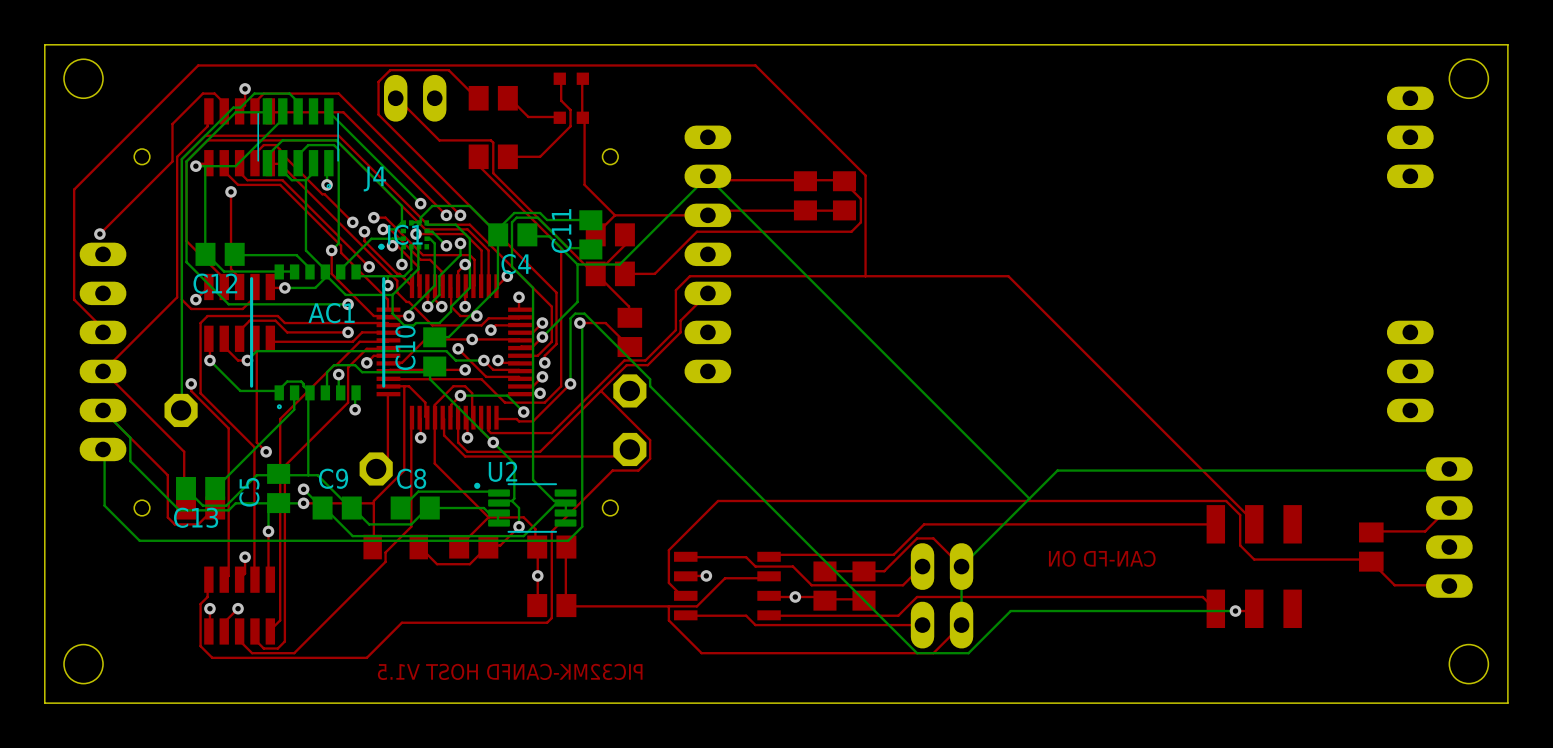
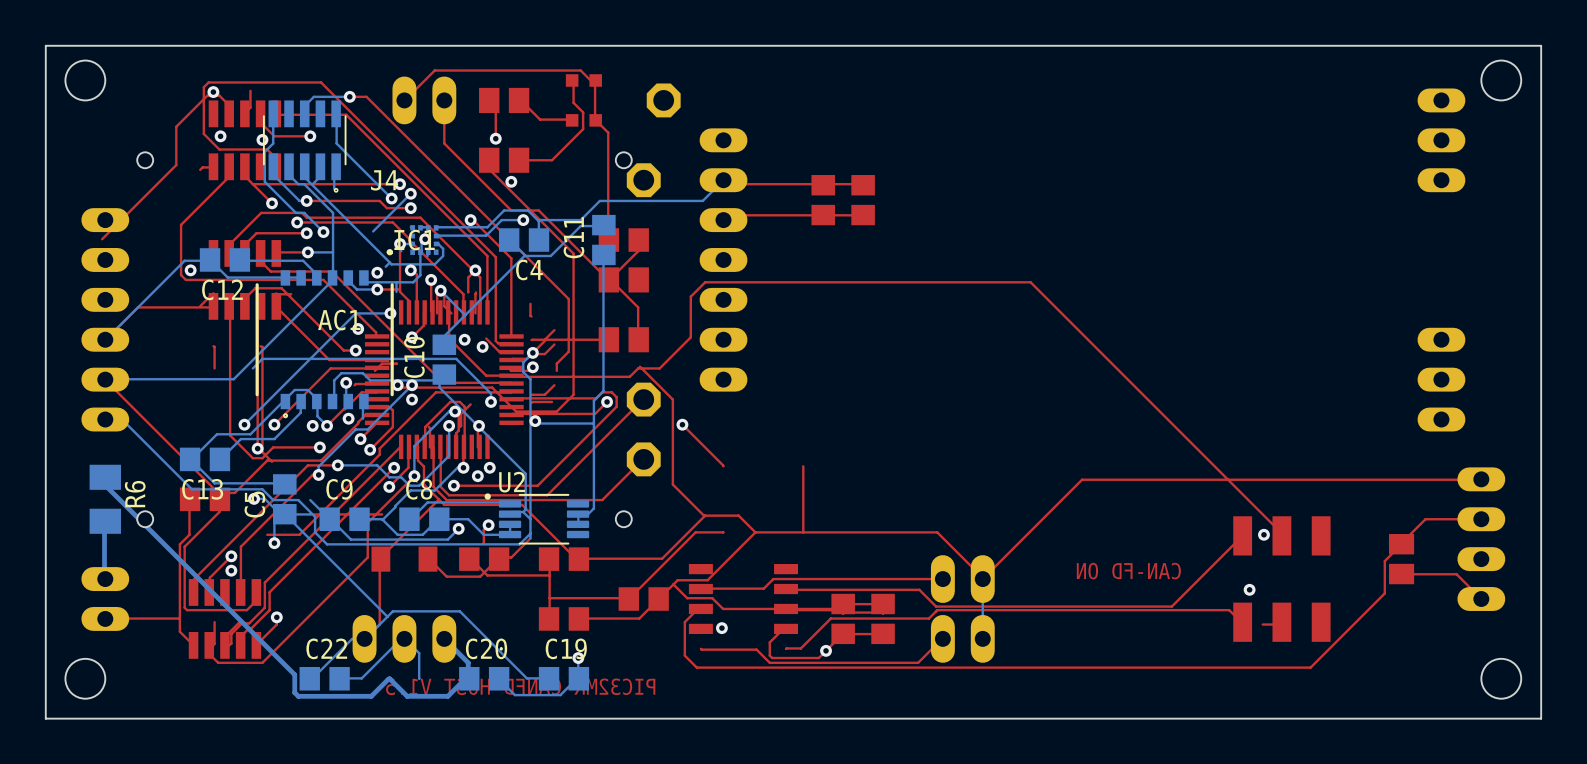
top track: none -> (595, 80) (591, 81) (580, 70) (434, 70) (404, 100)
via: (245, 88) -> none
via: none -> (213, 92)
top track: none -> (349, 96) (366, 96) (386, 117)
via: none -> (349, 96)
top track: (396, 98) (439, 140) (490, 140) (493, 142) (493, 173) (595, 273) -> (444, 100) (444, 143) (511, 210) (538, 210) (608, 279)
top track: (478, 98) (448, 70) (390, 70) (378, 81) (378, 114) -> (489, 100) (495, 106) (495, 138)
part: none -> (663, 100)
top track: (208, 111) (207, 126) (177, 156) (177, 220) -> (229, 166) (228, 177) (181, 224)
top track: (254, 111) (256, 109) (256, 100) (263, 93) (338, 93) (460, 215) -> (260, 113) (261, 123) (274, 136) (310, 136)
bottom track: (267, 111) (235, 112) (186, 161) (186, 262) (228, 304) (348, 304) -> (273, 113) (273, 143) (264, 151) (264, 181) (295, 212) (304, 212) (323, 232)
bottom track: (282, 111) (282, 119) (235, 166) (195, 166) -> none
bottom track: (298, 111) (296, 100) (289, 93) (254, 93) (240, 107) (233, 107) (181, 159) (181, 410) -> (304, 113) (305, 105) (313, 96) (349, 96)
bottom track: (329, 112) (420, 203) -> none
top track: (338, 112) (343, 112) (446, 215) -> (346, 114) (487, 255) (487, 312)
top track: (582, 117) (584, 119) (584, 184) (615, 215) -> (595, 120) (608, 132) (608, 240)
via: none -> (220, 136)
via: none -> (310, 136)
via: none -> (495, 138)
via: none -> (262, 139)
bottom track: (334, 145) (308, 145) (298, 154) (298, 163) -> (341, 148) (336, 143) (336, 114)
bottom track: (338, 149) (338, 243) (331, 250) -> (346, 153) (391, 198)
top track: (224, 163) (226, 163) (226, 173) (238, 184) (280, 184) (341, 245) (341, 252) (387, 299) (388, 309) -> none
top track: (254, 163) (256, 161) (256, 152) (263, 145) (275, 145) (280, 152) (352, 222) -> none
bottom track: (267, 163) (268, 154) (282, 140) (336, 140) (401, 205) (401, 222) (394, 229) (383, 229) -> (273, 166) (274, 175) (299, 200) (306, 200)
top track: (270, 163) (280, 163) (397, 280) (397, 292) (432, 325) (481, 325) (488, 318) (520, 317) -> (276, 166) (275, 157) (267, 149) (219, 149) (203, 133) (203, 87) (208, 82) (321, 82) (495, 257) (495, 340) (498, 343) (511, 344)
via: (195, 166) -> none
bottom track: (205, 166) (205, 254) (224, 271) -> (105, 339) (184, 260) (210, 259) (228, 277)
part: none -> (643, 180)
bottom track: (707, 176) (1029, 498) -> none
via: none -> (511, 181)
top track: none -> (252, 184) (272, 203)
top track: (282, 180) (369, 266) -> (288, 184) (400, 184)
bottom track: (297, 180) (305, 180) (305, 250) (327, 271) (325, 271) -> (304, 184) (333, 212) (331, 281) (233, 379) (105, 379)
via: none -> (400, 184)
top track: (844, 181) (860, 198) (860, 222) (851, 231) (696, 231) (654, 273) (625, 273) -> none
via: (327, 184) -> none
bottom track: none -> (410, 193) (373, 231)
via: none -> (410, 193)
top track: (231, 191) (231, 269) (238, 276) (239, 287) -> none
via: (231, 191) -> none
via: none -> (391, 198)
top track: none -> (306, 200) (379, 200) (386, 208) (410, 208)
via: none -> (306, 200)
bottom track: (687, 196) (619, 264) (577, 264) -> (702, 200) (599, 200) (580, 220) (538, 220)
via: none -> (272, 203)
via: none -> (410, 208)
via: (420, 203) -> none
top track: none -> (470, 217) (511, 258) (511, 336)
via: (446, 215) -> none
via: none -> (523, 220)
top track: (615, 215) (595, 234) -> none
top track: (707, 215) (615, 215) -> none
via: none -> (297, 222)
top track: none -> (382, 222) (297, 222)
via: (373, 217) -> none
top track: (384, 217) (423, 255) (469, 255) (474, 259) (473, 286) -> (392, 222) (463, 294) (463, 312)
bottom track: (590, 220) (547, 220) (540, 212) (514, 212) (495, 231) (498, 234) -> (603, 225) (580, 226) (550, 255) (525, 255) (509, 240)
via: (352, 222) -> none
bottom track: (419, 222) (420, 217) (432, 205) (469, 205) (498, 234) -> none
bottom track: (426, 222) (427, 224) (455, 224) (469, 238) (469, 287) (451, 306) (451, 311) (439, 323) (416, 323) (413, 325) (404, 325) (392, 313) (392, 294) -> (436, 227) (487, 227) (504, 210) (528, 210) (538, 221) (539, 240)
via: none -> (323, 232)
top track: none -> (306, 233) (256, 233) (245, 244) (244, 253)
via: none -> (306, 233)
top track: (383, 229) (390, 229) (420, 259) (430, 259) (441, 271) (442, 286) -> none
via: (383, 229) -> none
top track: (364, 231) (364, 241) (411, 286) -> none
via: (364, 231) -> none
bottom track: (427, 231) (432, 231) (446, 245) -> (436, 236) (486, 235) (501, 220) (523, 220)
via: (99, 234) -> none
top track: (416, 234) (465, 234) (481, 250) (481, 286) -> none
bottom track: (498, 234) (497, 287) (448, 337) (434, 337) -> (525, 255) (444, 336) (444, 344)
bottom track: (527, 234) (549, 236) (577, 264) -> none
bottom track: none -> (423, 240) (421, 242) (420, 252)
top track: none -> (400, 244) (400, 291) (408, 300) (408, 312)
bottom track: (391, 238) (371, 238) (338, 271) (340, 271) -> (377, 289) (356, 289) (348, 281) (348, 277)
via: none -> (400, 244)
bottom track: (428, 238) (434, 243) (434, 285) (408, 311) (408, 316) -> (438, 244) (443, 248) (443, 255) (434, 264) (391, 264) (305, 178) (304, 166)
bottom track: (460, 243) (460, 255) (439, 276) (439, 294) (427, 306) -> none
via: (460, 243) -> none
top track: (392, 245) (397, 245) (418, 266) (419, 286) -> none
via: (392, 245) -> none
via: (446, 245) -> none
top track: none -> (307, 252) (276, 253)
via: none -> (307, 252)
bottom track: none -> (333, 252) (307, 252)
bottom track: (403, 246) (401, 248) (401, 264) -> none
top track: none -> (229, 253) (230, 244) (261, 212) (301, 212) (306, 217) (420, 217) (480, 277) (479, 312)
top track: none -> (260, 253) (261, 261) (270, 271) (331, 271) (443, 382) (511, 383)
bottom track: (590, 249) (568, 248) (537, 217) (516, 217) (512, 222) (512, 266) (533, 287) (533, 479) (554, 500) (563, 500) (565, 503) (558, 500) (523, 536) (352, 536) (323, 508) -> (603, 254) (603, 391) (593, 400) (593, 508) (587, 514) (578, 514)
top track: (331, 250) (331, 273) (373, 316) (408, 316) -> none
via: (331, 250) -> none
bottom track: (418, 250) (418, 269) (392, 294) -> none
bottom track: none -> (389, 262) (385, 266)
bottom track: (577, 264) (577, 301) (542, 337) -> none
top track: none -> (416, 273) (416, 312)
top track: (177, 269) (177, 297) (103, 371) (184, 451) (184, 508) (185, 508) -> (181, 275) (185, 279) (323, 279) (376, 332) (377, 336)
bottom track: (325, 271) (324, 273) (345, 294) (392, 294) -> none
bottom track: (325, 271) (327, 276) (315, 287) (284, 287) -> none
top track: none -> (431, 279) (432, 312)
via: none -> (431, 279)
top track: (596, 273) (629, 306) (629, 317) -> (609, 279) (638, 307) (638, 339)
top track: (507, 276) (496, 286) -> none
via: (507, 276) -> none
top track: (865, 276) (865, 175) (755, 65) (198, 65) (74, 189) (74, 299) (102, 327) (103, 332) -> (213, 306) (138, 307) (105, 339)
via: none -> (377, 289)
top track: none -> (400, 289) (377, 289)
bottom track: none -> (440, 290) (465, 315)
via: none -> (440, 290)
via: (387, 285) -> none
top track: (450, 286) (451, 306) (460, 316) (476, 316) -> none
top track: (488, 286) (488, 250) (467, 229) (425, 229) (336, 140) (207, 140) (186, 161) (186, 241) (224, 278) (224, 287) -> none
top track: (254, 287) (254, 297) (242, 308) (191, 308) (181, 299) (181, 159) (205, 135) (338, 135) (427, 224) (469, 224) (551, 306) (551, 341) (537, 355) (520, 355) -> none
via: (284, 287) -> none
top track: (707, 293) (680, 320) (680, 332) (647, 365) (626, 365) (540, 451) (467, 451) (458, 442) (458, 417) -> none
via: (519, 297) -> none
via position: (195, 299) -> (190, 270)
top track: none -> (229, 306) (230, 435) (252, 458) (262, 458) (273, 447) (319, 447)
top track: none -> (244, 306) (245, 297) (255, 288) (281, 288) (343, 350) (355, 350)
top track: none -> (260, 306) (257, 309) (257, 448)
top track: none -> (276, 306) (329, 360) (377, 360)
via: (348, 304) -> none
top track: none -> (424, 312) (423, 325) (412, 337)
top track: none -> (448, 312) (449, 338) (486, 375) (511, 375)
bottom track: none -> (390, 313) (355, 313) (244, 424)
via: none -> (390, 313)
via: (427, 306) -> none
via: (441, 306) -> none
via: (465, 306) -> none
part position: (239, 312) -> (244, 279)
via: (408, 316) -> none
via: (476, 316) -> none
via: none -> (358, 328)
via: (542, 323) -> none
top track: (579, 323) (605, 323) (629, 347) -> none
bottom track: (579, 323) (582, 325) (582, 526) (568, 540) (139, 540) (104, 505) (104, 449) (103, 449) -> none
via: (579, 323) -> none
top track: (388, 325) (387, 323) (284, 323) (277, 316) (207, 316) (200, 323) (200, 393) (254, 447) (254, 579) -> none
top track: (520, 325) (495, 325) (490, 330) -> none
via: none -> (412, 337)
via: (490, 330) -> none
top track: none -> (486, 338) (499, 351) (511, 352)
top track: (348, 332) (287, 332) (275, 320) (249, 320) (240, 330) (239, 338) -> none
via: (348, 332) -> none
top track: (388, 332) (362, 332) (352, 341) (273, 341) (270, 338) -> none
via: none -> (464, 339)
top track: none -> (608, 339) (546, 339) (526, 358) (511, 360)
part rotation: 0° (629, 332) -> 90° clockwise (623, 339)
via: (542, 337) -> none
top track: (224, 338) (226, 339) (226, 348) (238, 360) (247, 360) -> none
top track: (388, 340) (359, 341) (280, 419) (280, 620) (270, 631) -> none
top track: (520, 340) (425, 339) (401, 362) (388, 363) -> none
via: none -> (355, 350)
bottom track: none -> (532, 352) (523, 362) (523, 372) (530, 379) (530, 519)
via: none -> (532, 352)
top track: (388, 348) (366, 348) (348, 367) (348, 402) (284, 465) (284, 641) (277, 648) (263, 648) (256, 641) (256, 632) (254, 631) -> none
top track: (458, 348) (486, 376) (519, 376) (520, 378) -> none
via: (458, 348) -> none
part position: (103, 351) -> (105, 319)
part position: (454, 351) -> (444, 379)
top track: none -> (639, 366) (672, 399) (672, 484) (704, 516)
top track: none -> (377, 367) (330, 368) (274, 424)
via: none -> (532, 367)
bottom track: (209, 360) (240, 390) (277, 390) (288, 381) -> (190, 459) (216, 434) (250, 434) (282, 401) (285, 401) (294, 390)
via: (209, 360) -> none
via: (247, 360) -> none
top track: (483, 360) (493, 369) (520, 371) -> none
bottom track: (483, 360) (455, 360) -> (490, 401) (490, 393) (465, 368)
via: (483, 360) -> none
via: (497, 360) -> none
via: (366, 362) -> none
via: (544, 362) -> none
top track: (616, 368) (551, 433) (490, 433) (488, 430) (488, 417) -> (629, 376) (511, 375)
top track: (465, 369) (388, 371) -> none
via: (465, 369) -> none
top track: none -> (105, 379) (219, 494) (219, 499)
top track: none -> (377, 383) (354, 385)
via: none -> (397, 385)
bottom track: none -> (412, 385) (367, 429) (355, 429) (318, 466) (318, 474)
via: none -> (412, 385)
via: (542, 376) -> none
top track: none -> (377, 391) (361, 392) (327, 425)
top track: none -> (511, 391) (435, 392) (379, 448) (379, 454) (299, 534) (267, 534)
top track: (191, 383) (191, 390) (228, 428) (228, 575) (224, 579) -> none
via: (191, 383) -> none
bottom track: (303, 383) (309, 392) (308, 393) (308, 475) -> (310, 392) (317, 401) (317, 416) (327, 425)
top track: (570, 383) (533, 421) (496, 417) -> none
bottom track: (570, 383) (570, 318) (575, 313) (584, 313) (650, 379) (650, 386) (917, 653) (968, 653) (1010, 611) (1235, 611) -> none
via position: (570, 383) -> (607, 401)
top track: (388, 386) (408, 386) (425, 402) (425, 416) (427, 417) -> none
top track: (404, 386) (404, 470) (373, 500) (372, 547) -> none
via: none -> (412, 399)
top track: none -> (511, 399) (596, 398) (602, 392) (611, 392) (616, 397) (616, 406) (537, 485) (453, 485)
top track: (600, 390) (650, 440) (650, 458) (638, 470) (612, 470) (551, 531) (551, 618) (547, 622) (401, 622) (366, 657) (212, 657) (200, 646) (200, 604) (207, 596) (208, 579) -> none
top track: none -> (643, 399) (547, 495) (449, 495) (440, 486) (440, 446)
via: none -> (490, 401)
via: (540, 393) -> none
top track: none -> (607, 401) (595, 413) (511, 414)
top track: (388, 394) (387, 456) (376, 468) -> none
bottom track: (460, 395) (507, 395) (523, 412) -> none
via: (460, 395) -> none
top track: none -> (377, 407) (390, 407) (392, 410) (392, 427) (370, 449)
top track: none -> (455, 411) (458, 415) (456, 446)
bottom track: none -> (455, 411) (449, 411) (414, 446) (414, 476)
via: none -> (455, 411)
bottom track: (294, 403) (294, 409) (215, 488) -> (300, 412) (274, 439) (240, 439) (219, 459)
top track: none -> (377, 414) (365, 415) (321, 460) (267, 460) (234, 492) (219, 492) (219, 499)
via: none -> (348, 418)
via: (355, 409) -> none
top track: (103, 410) (167, 475) (167, 517) (174, 524) (198, 524) (215, 508) -> none
bottom track: (103, 410) (130, 437) (130, 461) (179, 510) (228, 510) (235, 503) (278, 503) -> (105, 419) (122, 419) (191, 489) (262, 489) (273, 500) (298, 500) (315, 516) (315, 532) (327, 544) (519, 544) (530, 533)
part: (181, 410) -> none
top track: none -> (377, 422) (360, 439)
bottom track: none -> (593, 423) (540, 423)
via: none -> (244, 424)
via: none -> (274, 424)
top track: none -> (682, 424) (723, 466)
via: none -> (682, 424)
via: none -> (312, 425)
via: none -> (327, 425)
bottom track: none -> (449, 425) (449, 455) (419, 485) (409, 485) (401, 477) (389, 477) (377, 465) (337, 465)
via: none -> (449, 425)
via: none -> (479, 425)
top track: (411, 417) (411, 526) (385, 552) (385, 561) (294, 653) (252, 653) (240, 641) (239, 631) -> none
top track: (442, 417) (444, 435) (465, 456) (622, 456) -> (432, 446) (433, 486) (446, 500) (602, 500) (635, 466)
top track: (473, 417) (472, 393) (465, 386) (453, 386) (434, 404) (434, 463) (488, 517) -> none
via: none -> (360, 439)
via: none -> (319, 447)
top track: none -> (401, 446) (264, 582) (264, 607) (249, 623) (238, 623) (225, 636) (224, 645)
top track: none -> (408, 446) (408, 467) (389, 486)
top track: none -> (416, 446) (418, 460) (423, 466) (423, 484) (444, 504) (522, 504) (575, 558) (662, 558) (705, 515) (738, 515) (755, 532)
top track: none -> (424, 446) (425, 427) (450, 401) (459, 401) (464, 406) (463, 467)
via: (420, 437) -> none
via: (467, 437) -> none
via: none -> (257, 448)
via: none -> (370, 449)
via: (493, 442) -> none
bottom track: none -> (190, 459) (214, 483) (284, 484)
via: (266, 451) -> none
top track: none -> (337, 465) (307, 465) (194, 579) (193, 592)
via: none -> (337, 465)
top track: none -> (803, 466) (803, 532)
top track: none -> (394, 467) (269, 592) (269, 610) (240, 636) (240, 645)
via: none -> (394, 467)
bottom track: none -> (463, 467) (457, 467) (434, 490) (410, 490) (382, 519)
via: none -> (463, 467)
via: none -> (489, 467)
top track: none -> (318, 474) (312, 474) (240, 546) (240, 592)
via: none -> (318, 474)
top track: none -> (414, 476) (367, 522) (367, 557) (262, 662) (218, 662) (209, 654) (209, 645)
via: none -> (414, 476)
via: none -> (477, 476)
bottom track: none -> (105, 477) (105, 485) (294, 674) (294, 692) (298, 696) (371, 696) (389, 678) (407, 696) (447, 696) (465, 678) (469, 678) (468, 662) (444, 638)
part: (376, 468) -> none
top track: none -> (1481, 479) (1082, 479) (982, 579) (937, 532) (755, 532)
bottom track: (1449, 468) (1448, 470) (1057, 470) (961, 566) -> none
via: none -> (453, 485)
via: none -> (389, 486)
R6: none -> (105, 499)
top track: none -> (190, 499) (189, 534) (179, 544) (179, 631) (193, 645)
bottom track: (185, 488) (202, 505) (226, 505) (256, 475) (317, 475) (351, 508) -> none
C13 position: (200, 488) -> (205, 459)
top track: none -> (219, 499) (219, 512) (184, 546) (184, 607) (187, 610) (246, 610) (255, 601) (256, 592)
bottom track: none -> (254, 498) (264, 498) (279, 513) (283, 513) (387, 616)
via: none -> (254, 498)
top track: none -> (438, 499) (379, 558) (379, 624) (364, 638)
via: (303, 489) -> none
via: (303, 503) -> none
part position: (200, 508) -> (205, 499)
bottom track: none -> (330, 519) (350, 539) (447, 539) (458, 528)
bottom track: (428, 508) (411, 524) (369, 524) (352, 508) -> (438, 519) (422, 534) (397, 534) (382, 519) (360, 519)
bottom track: (458, 508) (483, 508) (488, 512) (499, 513) (499, 522) -> (468, 519) (483, 534) (510, 534) (510, 524)
top track: (1448, 508) (1425, 531) (1371, 531) -> (1480, 519) (1425, 519) (1401, 543)
bottom track: none -> (105, 521) (105, 579)
top track: none -> (488, 525) (483, 530) (483, 543)
via: none -> (488, 525)
via: none -> (458, 528)
top track: (488, 517) (459, 547) -> (549, 575) (487, 575) (469, 559)
top track: (488, 517) (523, 517) (535, 529) (535, 545) (537, 547) -> none
top track: none -> (723, 532) (695, 532) (628, 599) (549, 598)
top track: none -> (755, 532) (707, 580) (677, 580) (639, 618) (578, 618)
via: none -> (1263, 534)
top track: (1215, 524) (924, 524) (893, 554) (769, 554) (769, 556) -> (1242, 535) (1171, 606) (936, 606) (919, 589) (786, 589)
via: (519, 526) -> none
top track: (268, 531) (268, 578) (270, 579) -> none
top track: none -> (231, 556) (209, 577) (209, 592)
via: none -> (231, 556)
top track: (566, 547) (565, 604) (568, 606) (696, 606) (725, 578) (767, 578) (769, 576) -> none
top track: (685, 556) (746, 557) (756, 566) -> (721, 588) (763, 588) (773, 579)
top track: (245, 557) (245, 573) (239, 579) -> none
via: (245, 557) -> none
via: none -> (231, 570)
top track: (1371, 561) (1394, 585) (1448, 585) -> (1401, 574) (1456, 574) (1480, 598)
top track: (1371, 561) (1371, 559) (1254, 559) (1240, 545) (1240, 515) (1226, 500) (718, 500) (668, 550) (668, 582) (680, 594) (685, 595) -> none
top track: (921, 566) (903, 585) (811, 585) (792, 566) -> (942, 579) (810, 579)
top track: (961, 566) (933, 538) (917, 538) (884, 571) (824, 571) -> none
top track: none -> (673, 584) (687, 598) (712, 598) (723, 608) (837, 608) (843, 604) (883, 604)
via: (537, 575) -> none
via position: (706, 575) -> (721, 628)
part: none -> (105, 599)
part: none -> (643, 599)
part position: (824, 586) -> (843, 618)
part position: (863, 586) -> (883, 618)
via position: (795, 596) -> (826, 650)
top track: none -> (276, 617) (276, 624) (256, 645)
via: none -> (276, 617)
top track: none -> (179, 618) (105, 618)
part position: (239, 605) -> (224, 618)
top track: (908, 605) (898, 615) (769, 615) -> (928, 618) (830, 618) (800, 648) (786, 648)
top track: (668, 606) (668, 620) (701, 653) -> (700, 608) (697, 608) (684, 622) (684, 655) (696, 667) (717, 667)
via: (209, 608) -> none
via: (238, 608) -> none
via position: (1235, 611) -> (1249, 589)
top track: (685, 615) (746, 615) (755, 625) (921, 625) -> (700, 648) (756, 649) (769, 662) (918, 662) (942, 638)
top track: none -> (786, 628) (782, 629) (769, 642) (769, 655) (772, 658) (818, 658) (843, 633) (883, 633)
part: none -> (404, 638)
top track: (961, 625) (933, 653) -> (1401, 544) (1384, 561) (1384, 593) (1310, 667) (954, 667)
bottom track: none -> (578, 658) (578, 678) (560, 695) (514, 695) (499, 678)
via: none -> (578, 658)
C22: none -> (324, 678)
bottom track: none -> (419, 678) (419, 653) (404, 638) (401, 638) (361, 678) (339, 678)
C20: none -> (484, 678)
bottom track: none -> (549, 678) (526, 678) (459, 611) (392, 611) (365, 638) (352, 638) (312, 678) (309, 678)
C19: none -> (563, 678)

